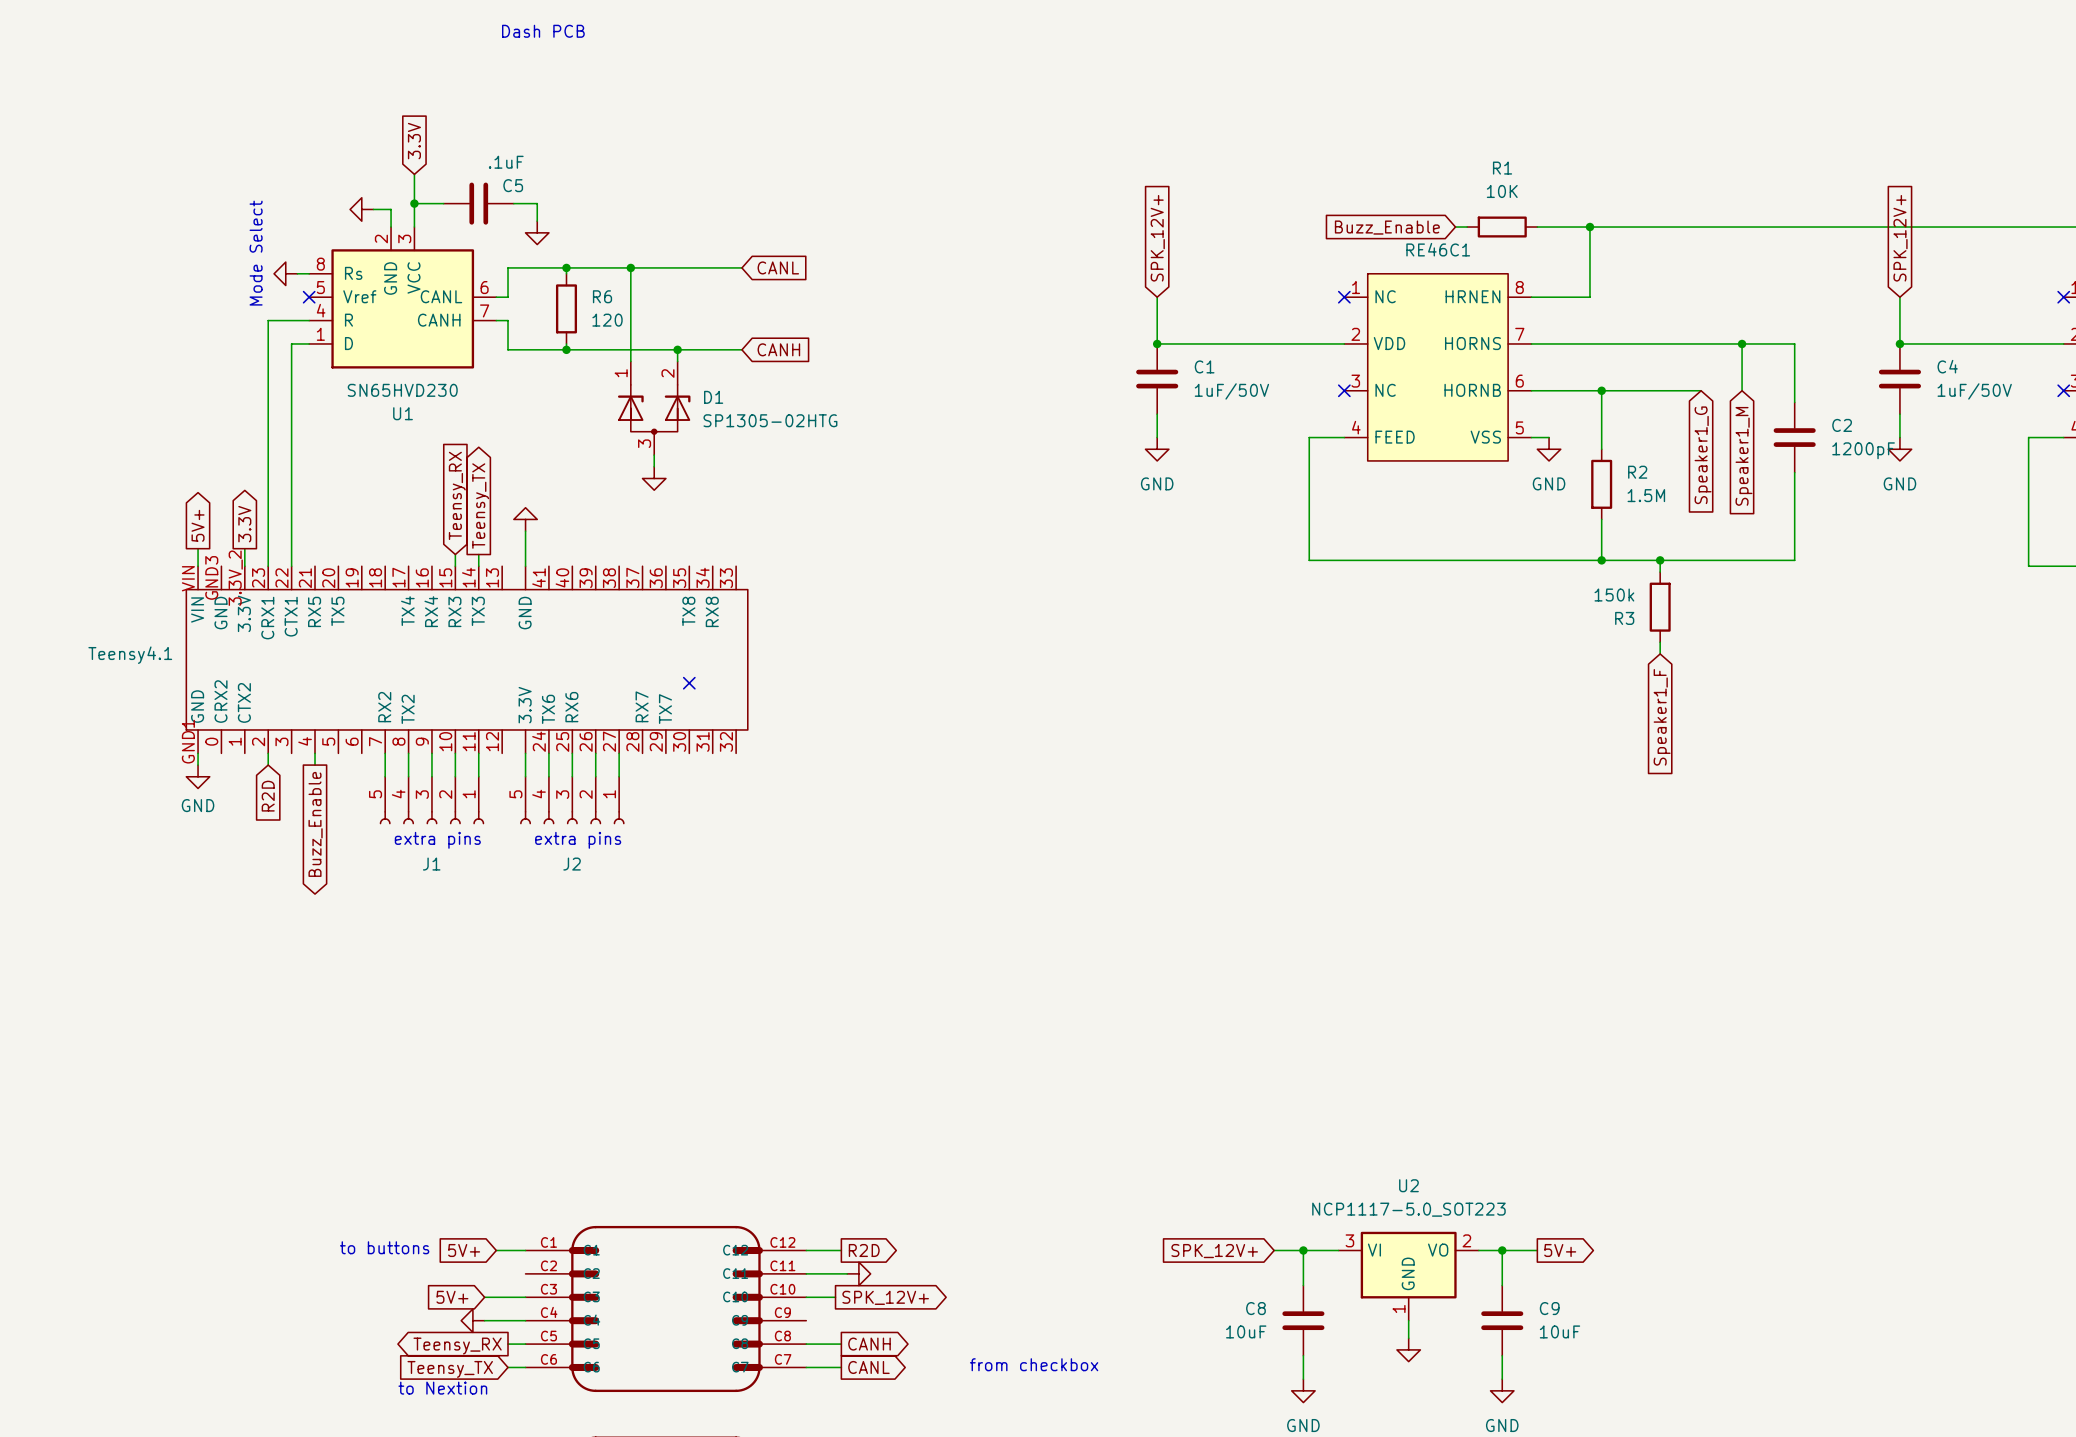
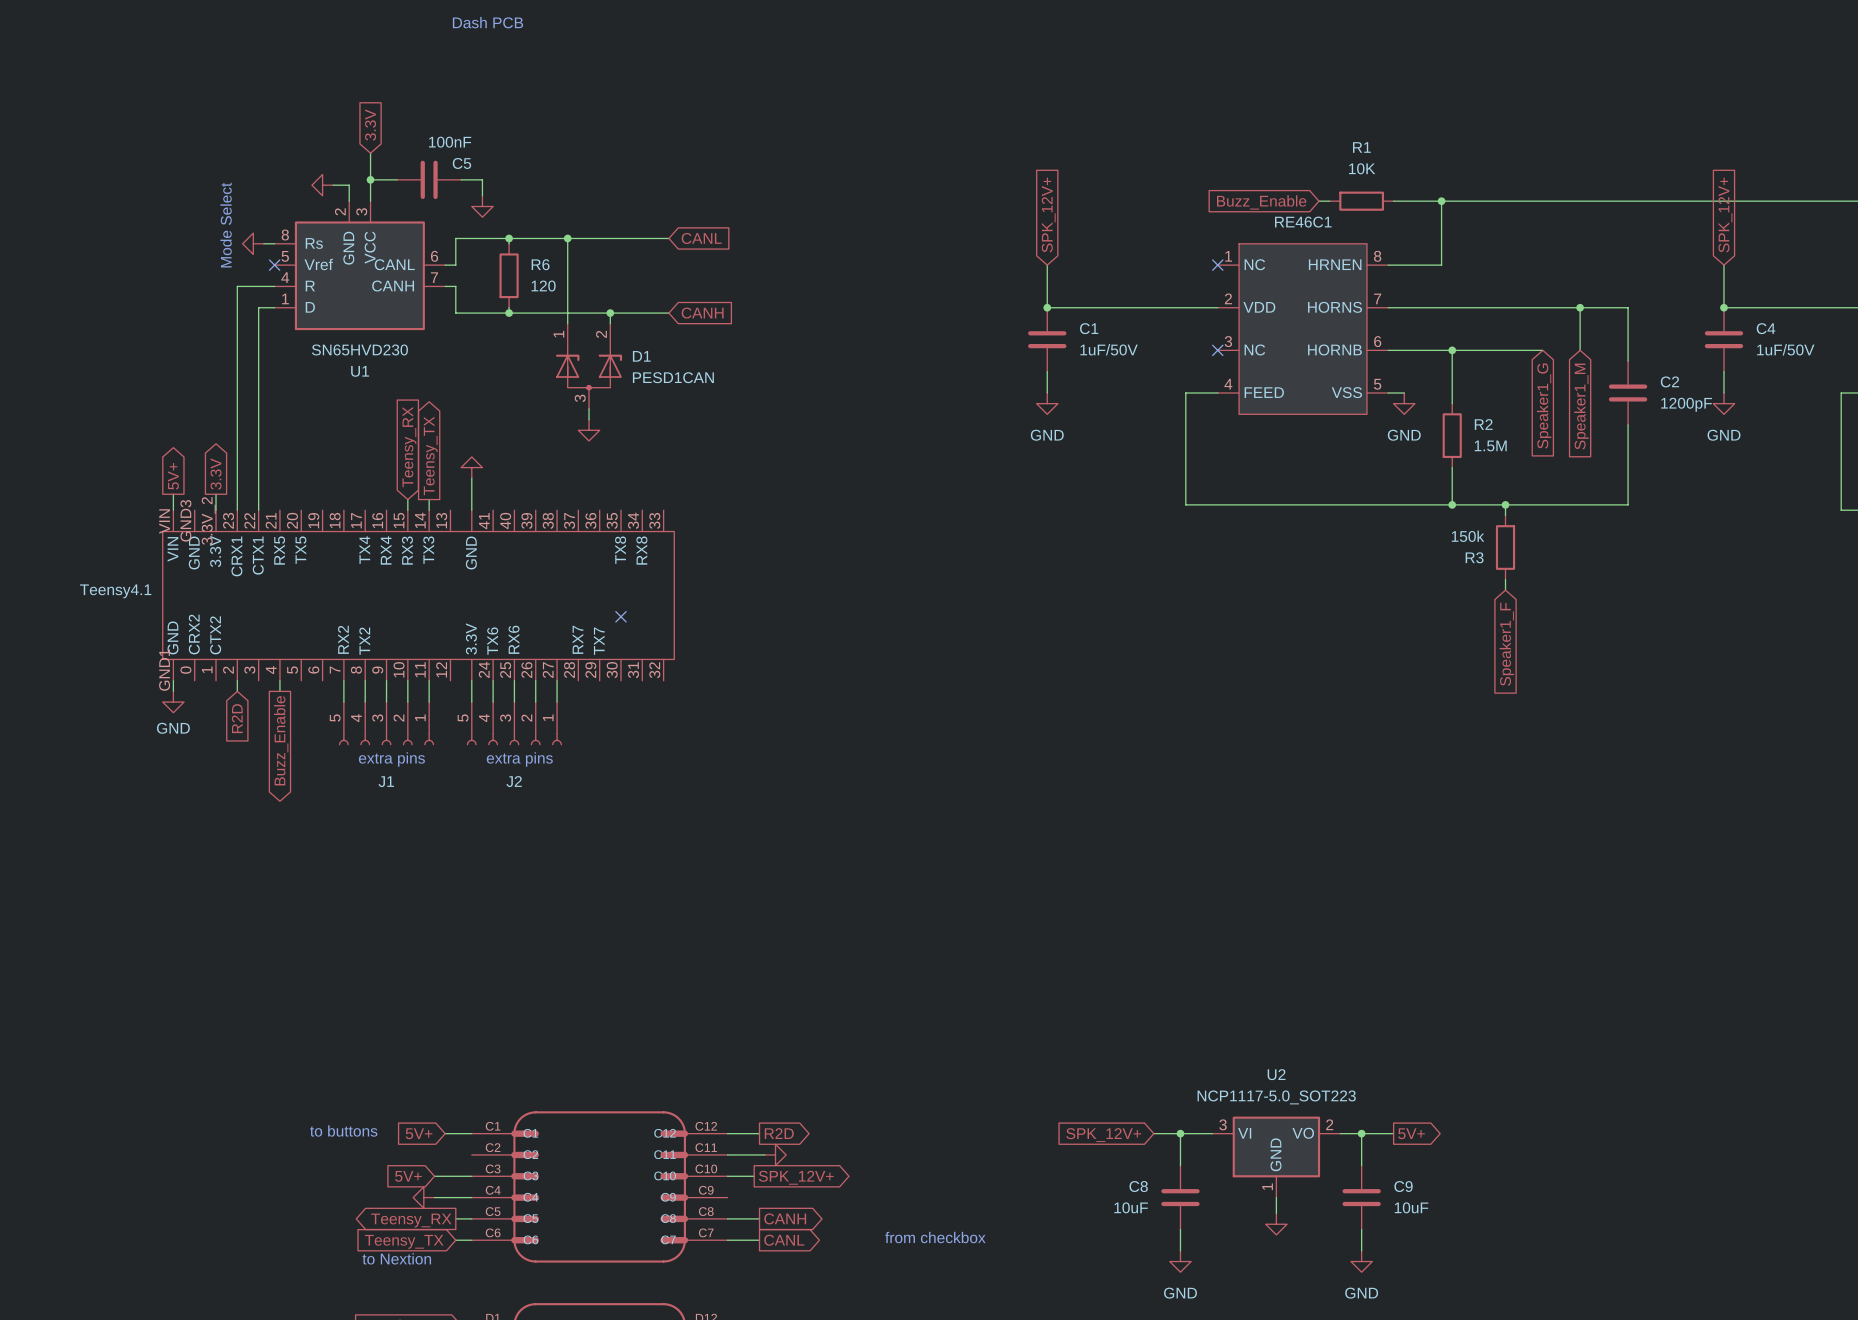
C5 value: .1uF (506, 162) -> 100nF (450, 142)
D1 value: SP1305-02HTG (770, 420) -> PESD1CAN (673, 377)

